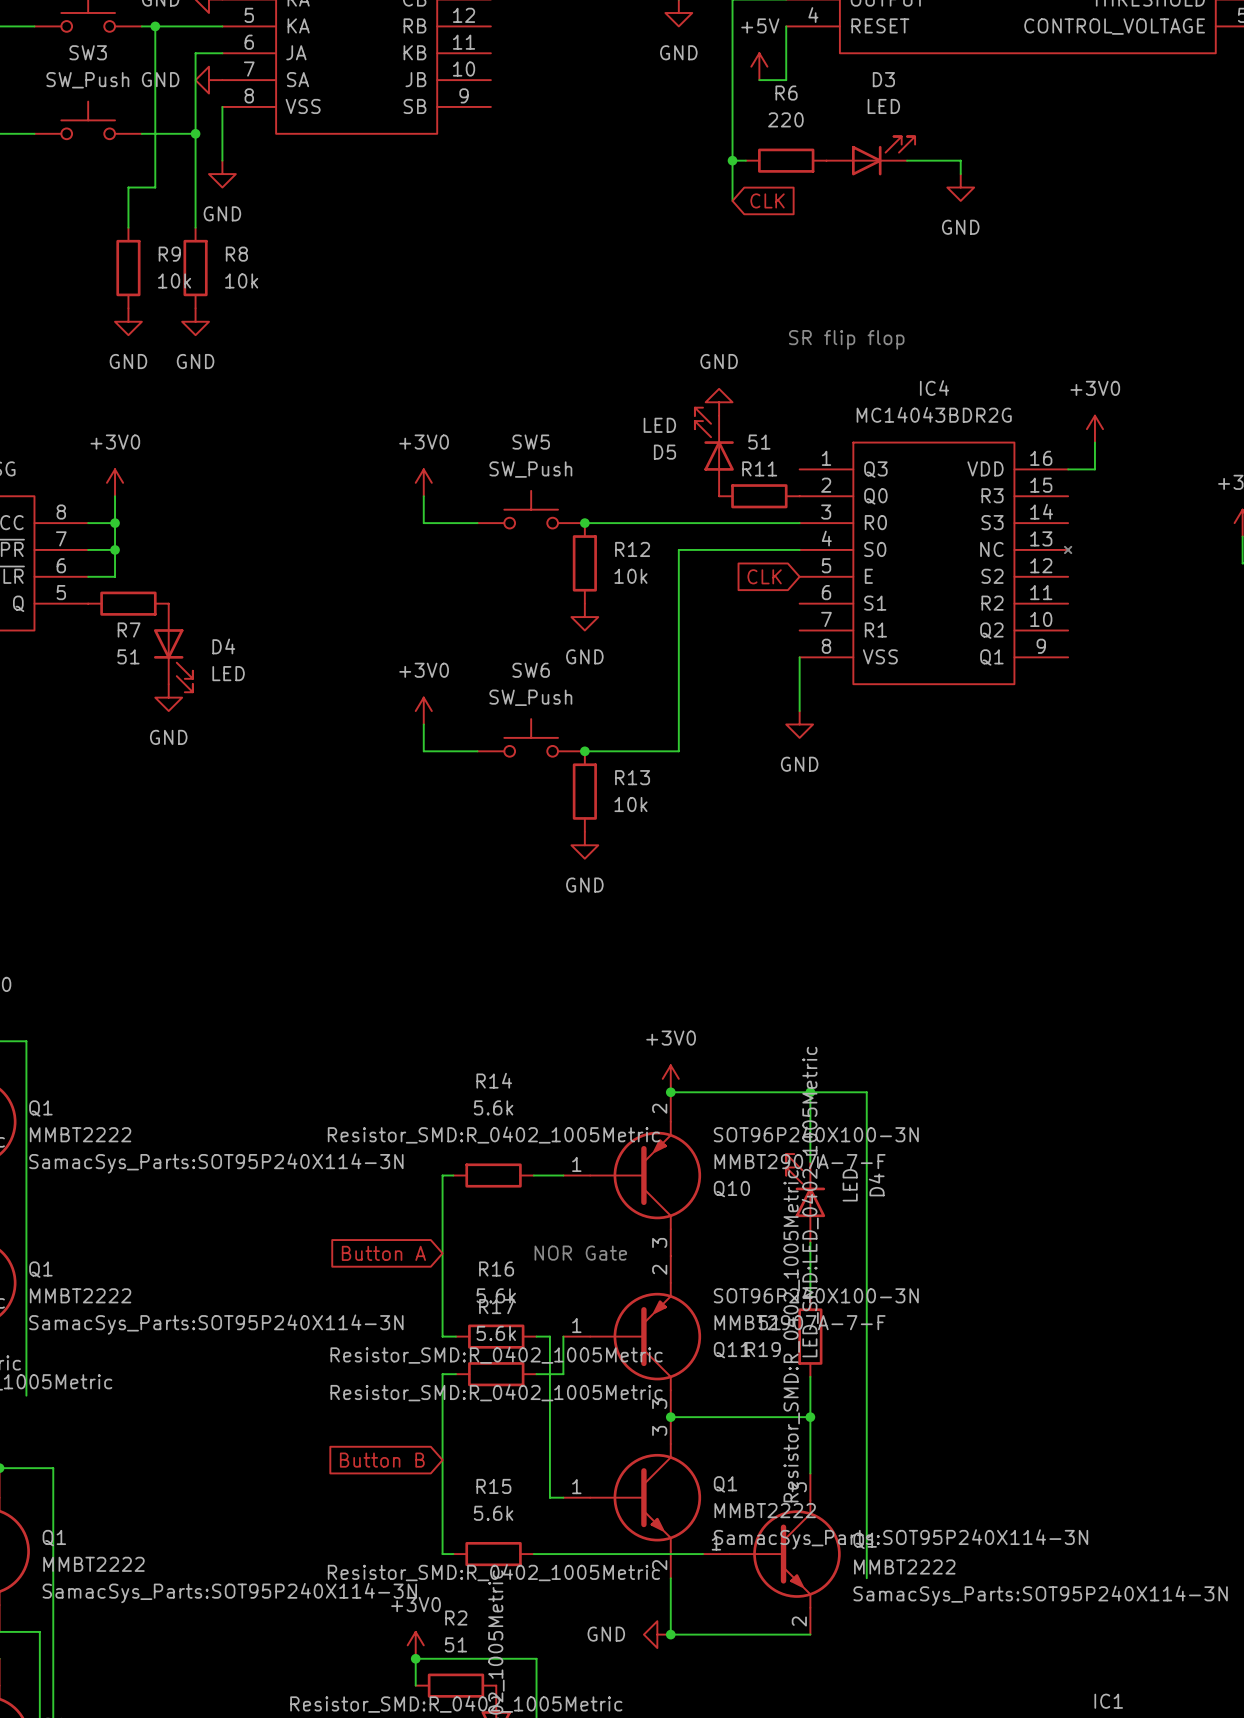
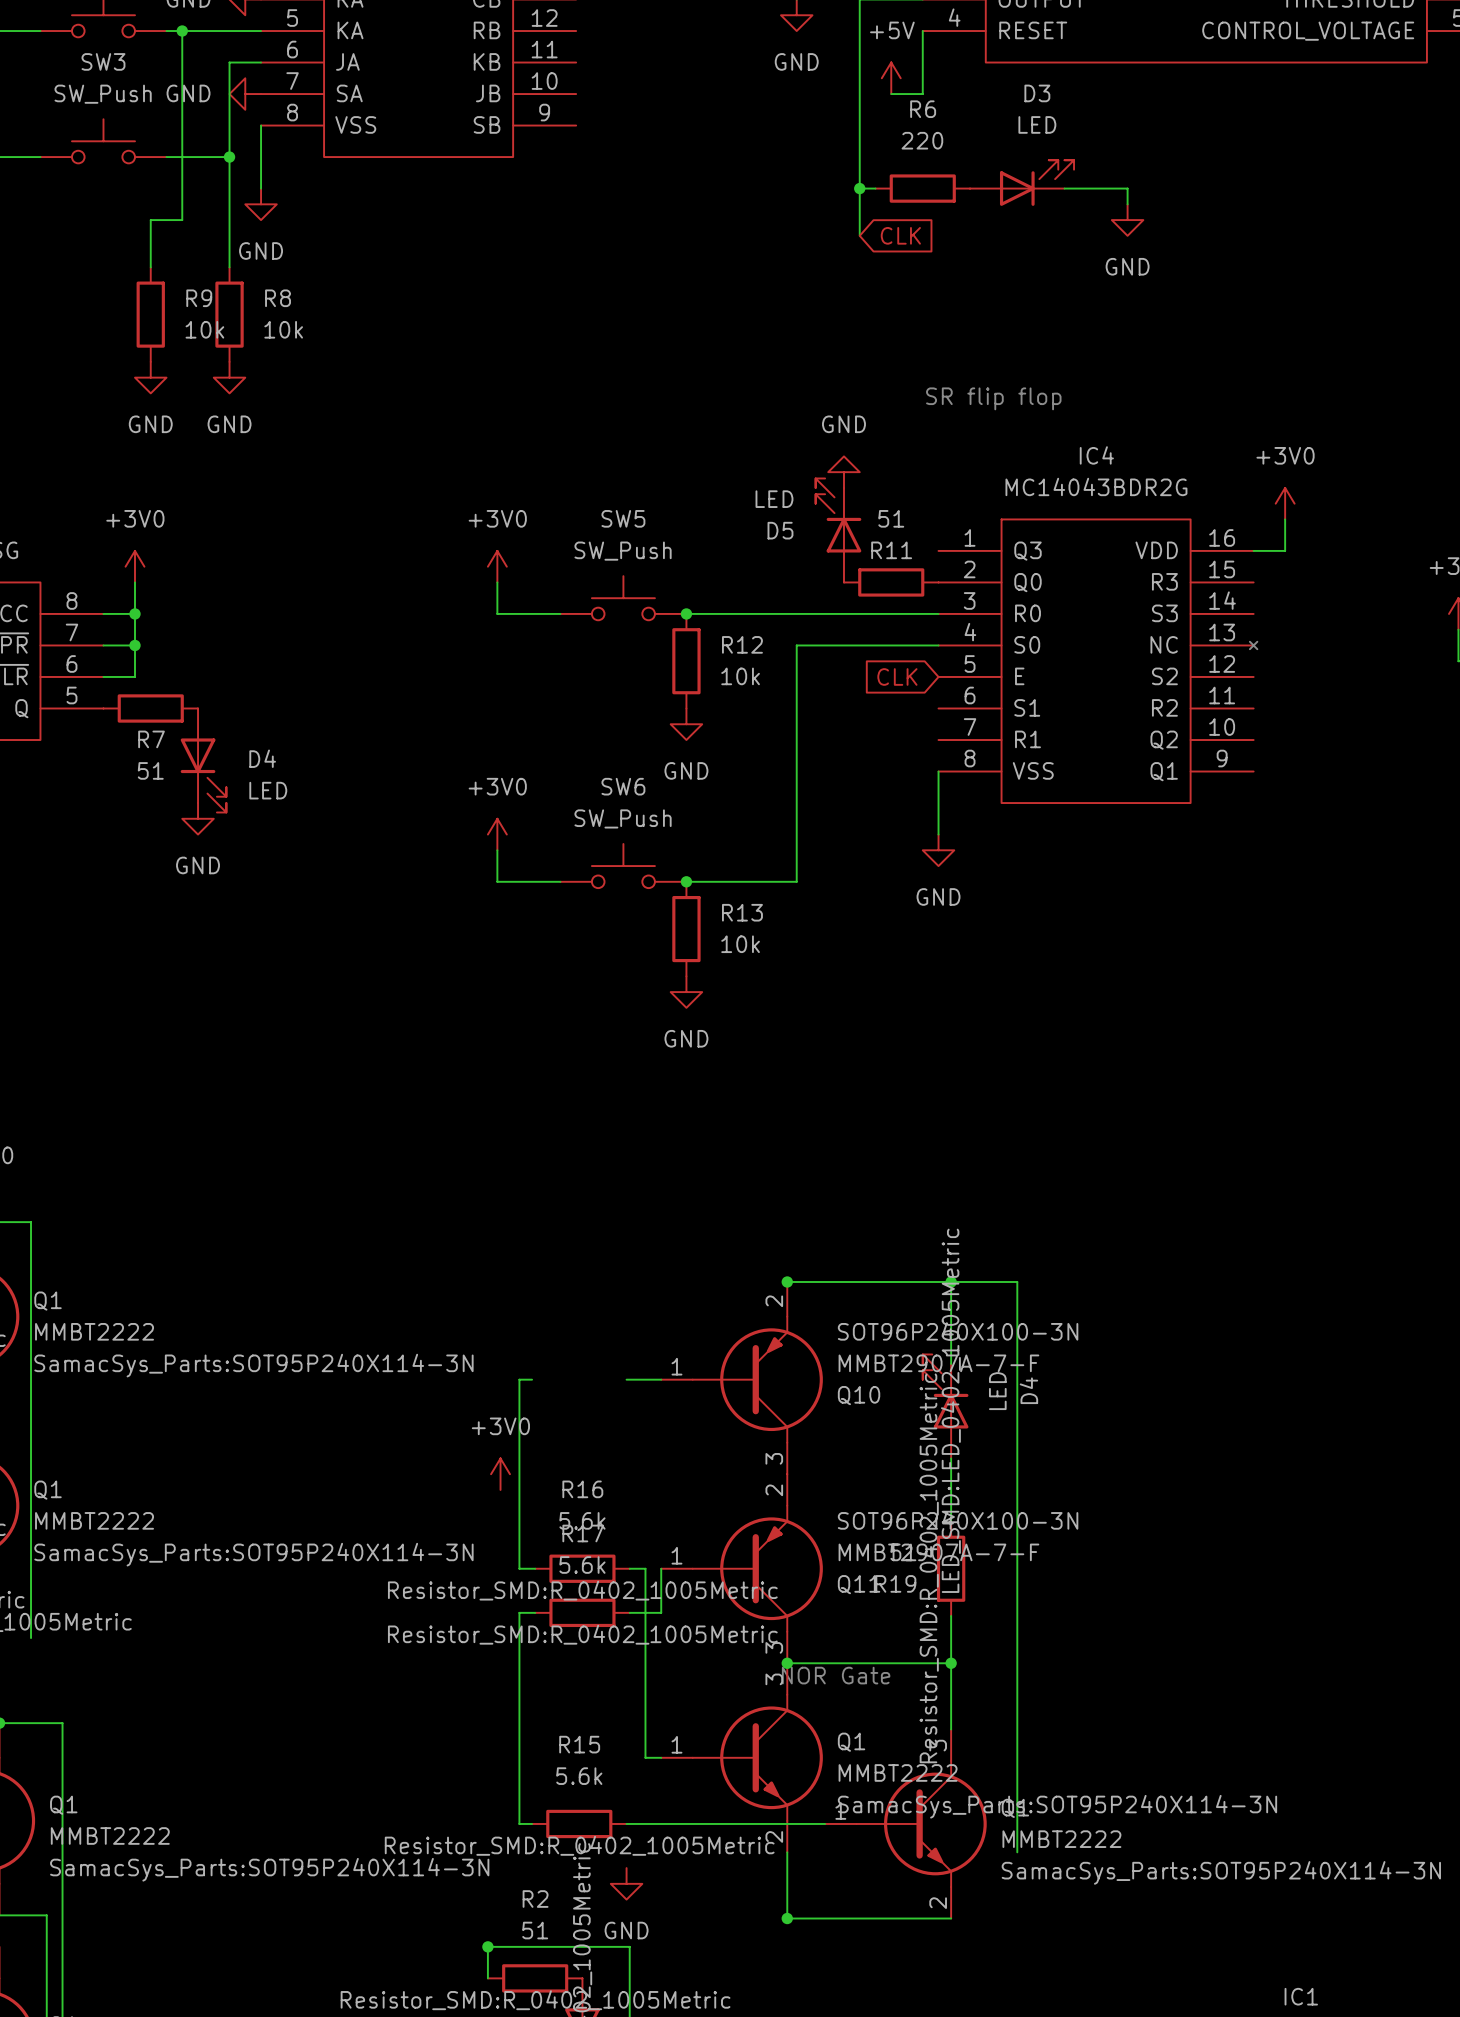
power symbol: +3V0 (670, 1078) -> none
R14: 5.6k (493, 1175) -> none
global label: Button A (383, 1253) -> none
text position: NOR Gate (580, 1253) -> NOR Gate (836, 1675)
power symbol: none -> +3V0 (500, 1474)
global label: Button B (382, 1460) -> none
power symbol: none -> GND (626, 1883)
power symbol: GND (657, 1634) -> none
power symbol: +3V0 (415, 1645) -> none

